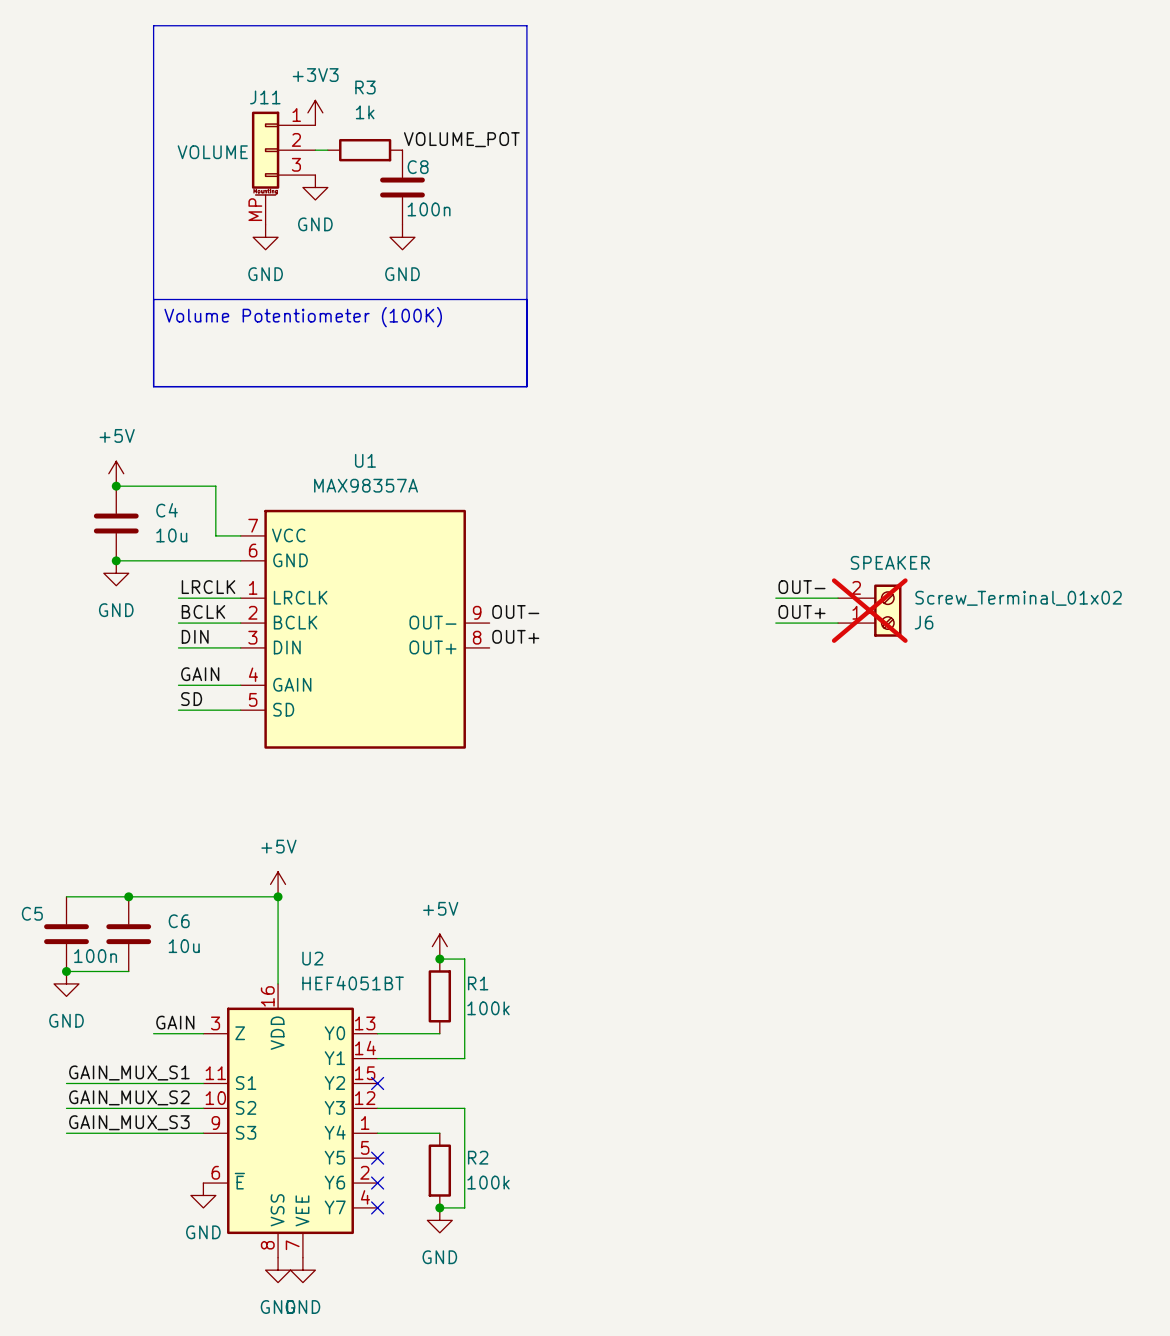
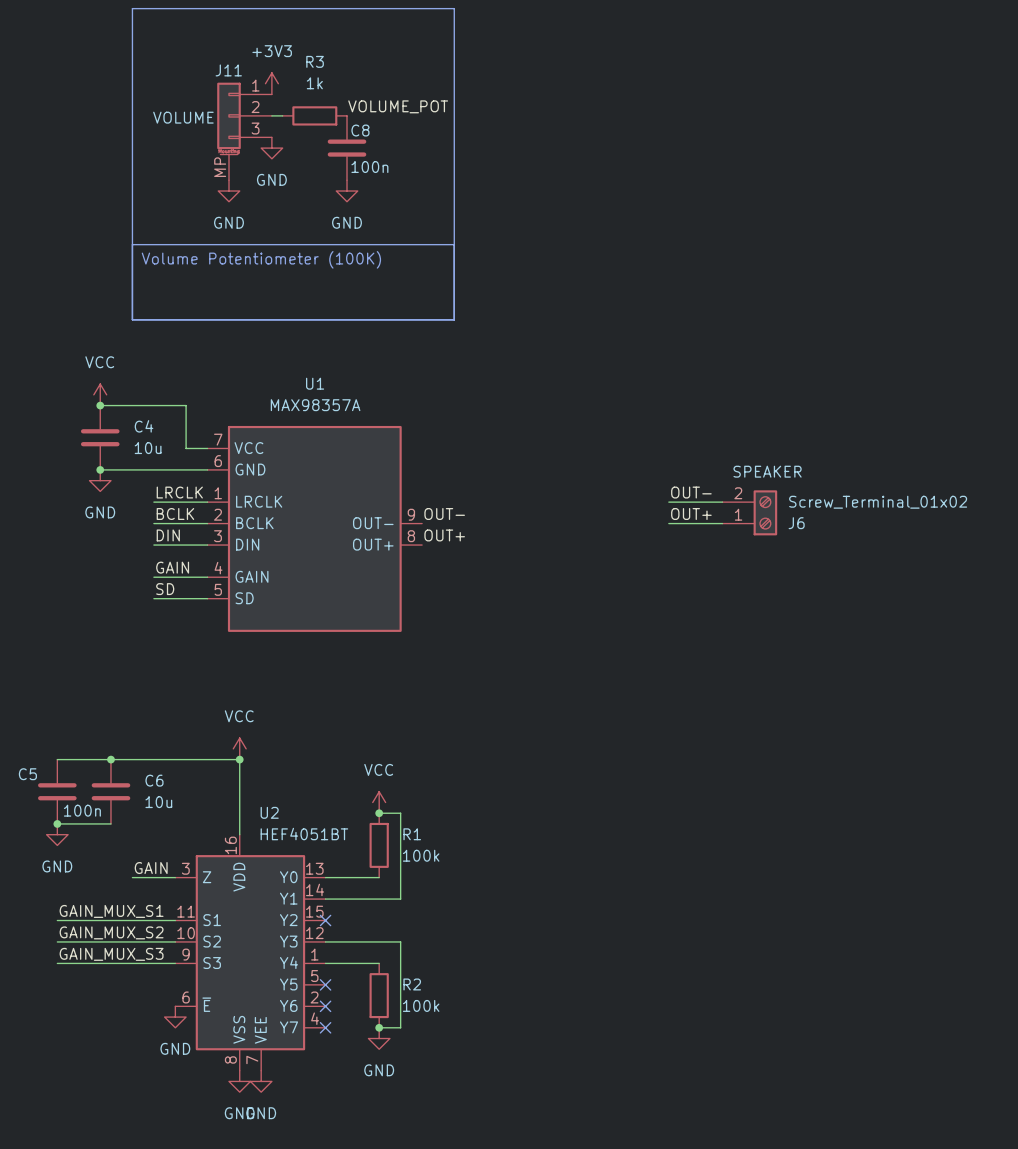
power symbol: +5V (116, 473) -> VCC (100, 394)
J6 do-not-place cross: (869, 610) -> none
power symbol: +5V (278, 884) -> VCC (239, 748)
power symbol: +5V (439, 946) -> VCC (379, 802)

